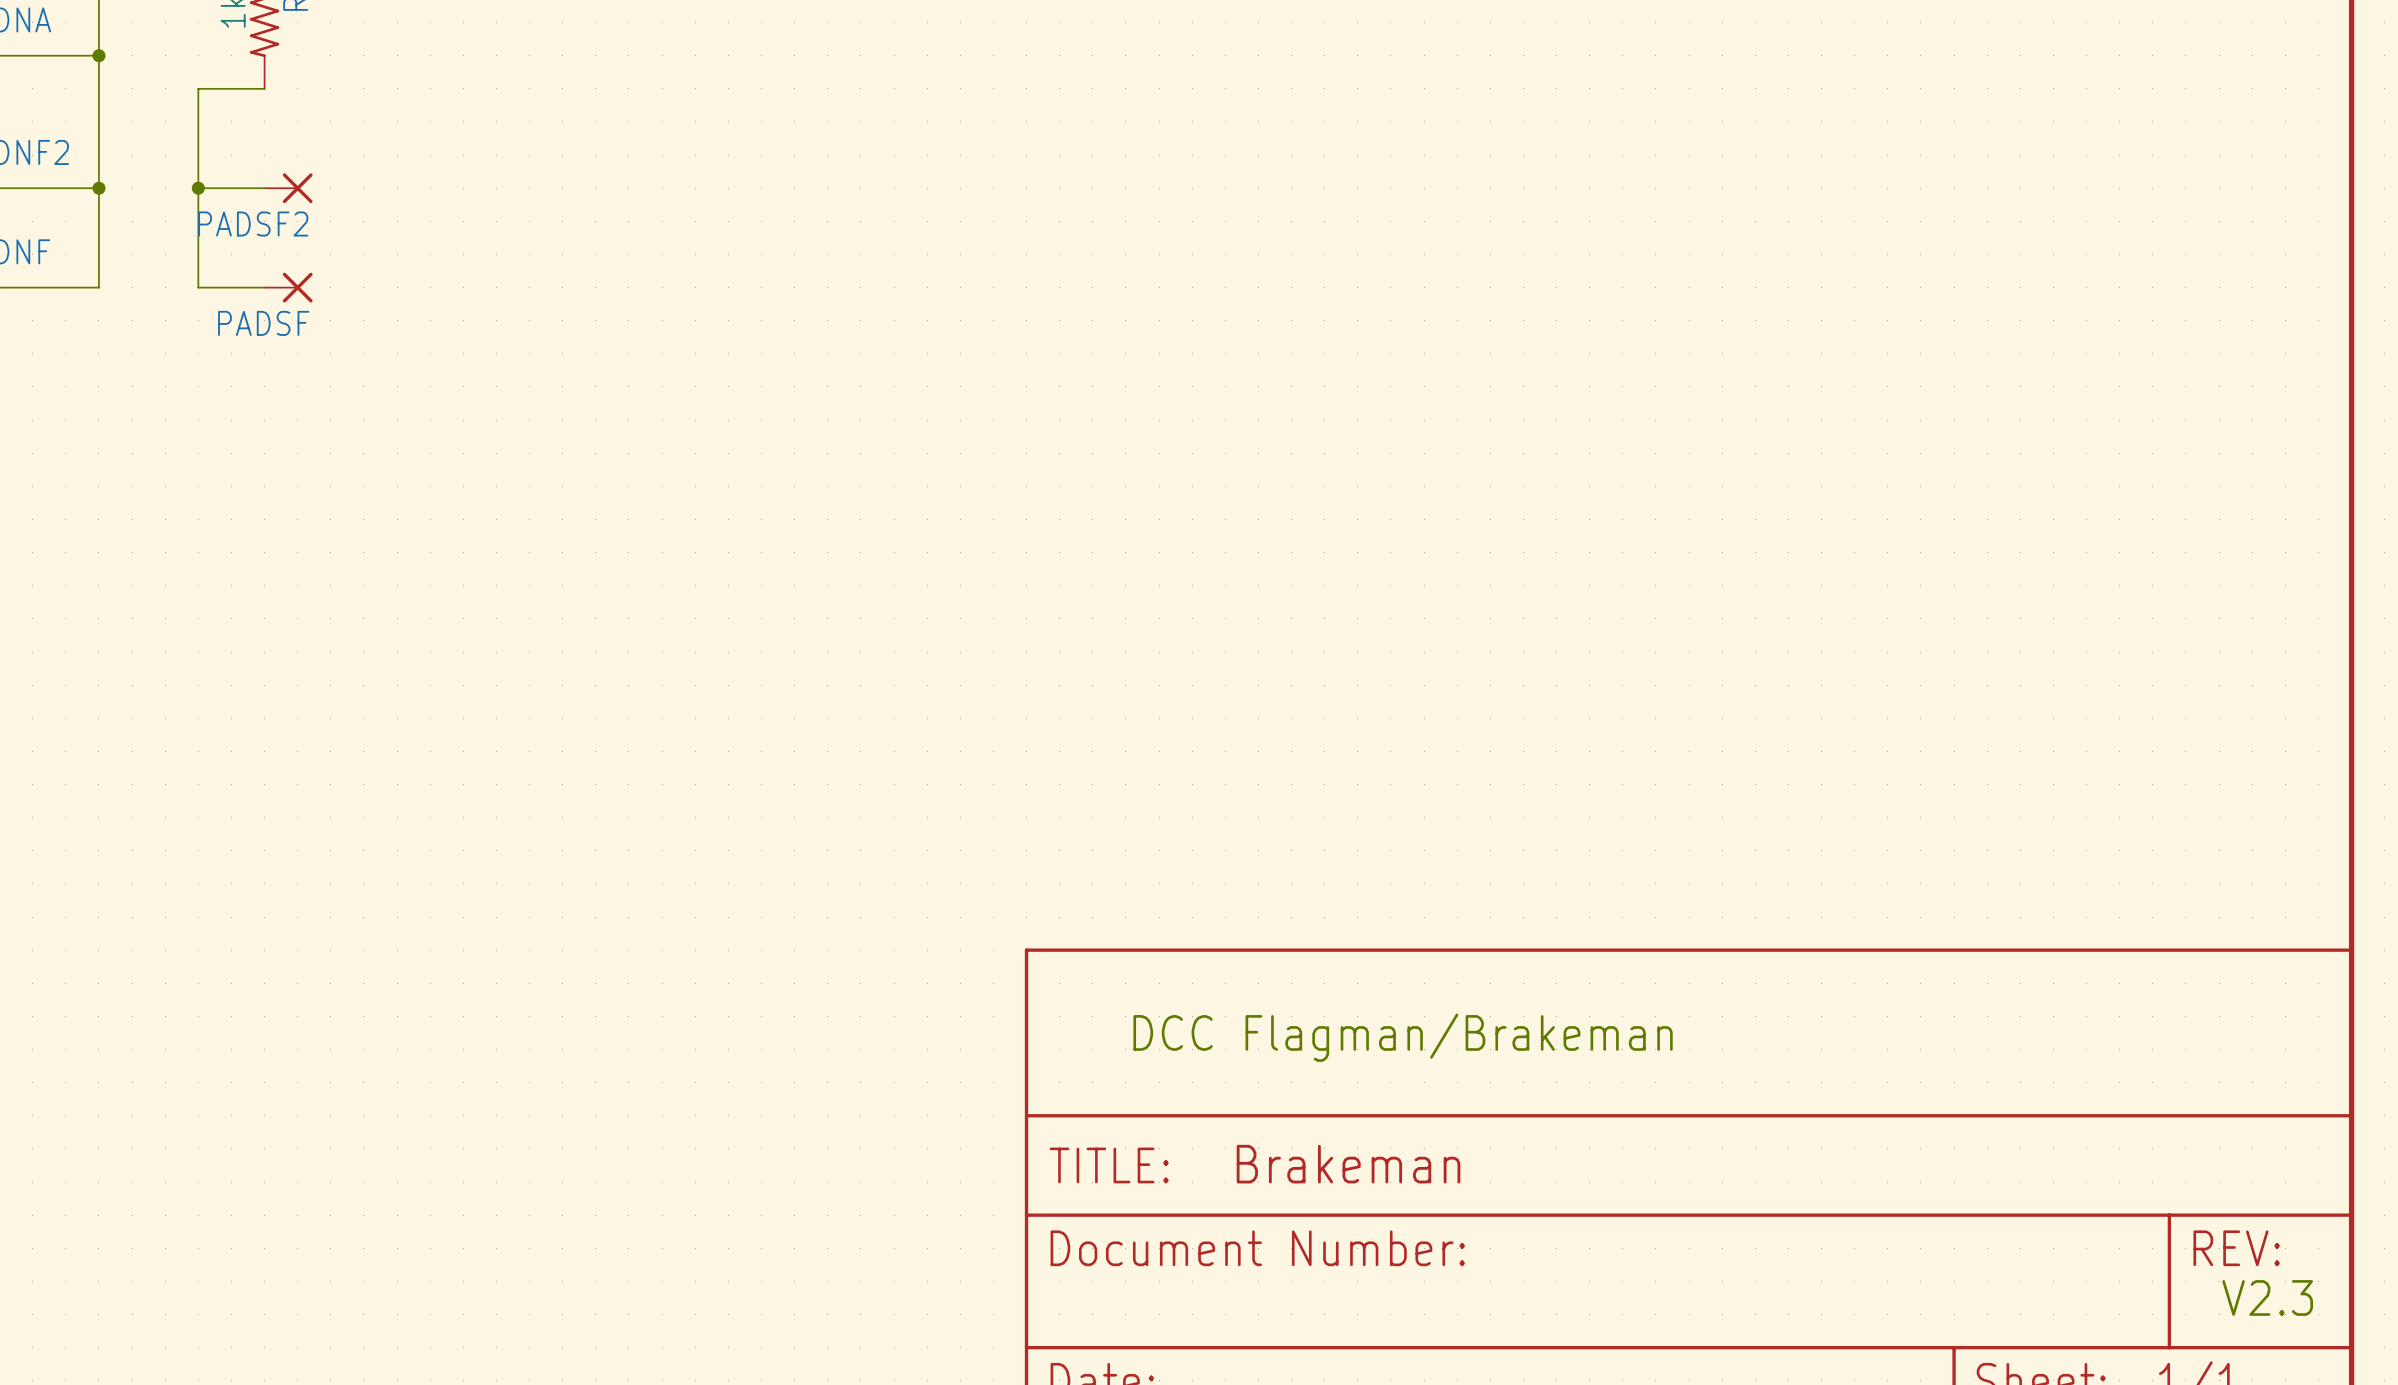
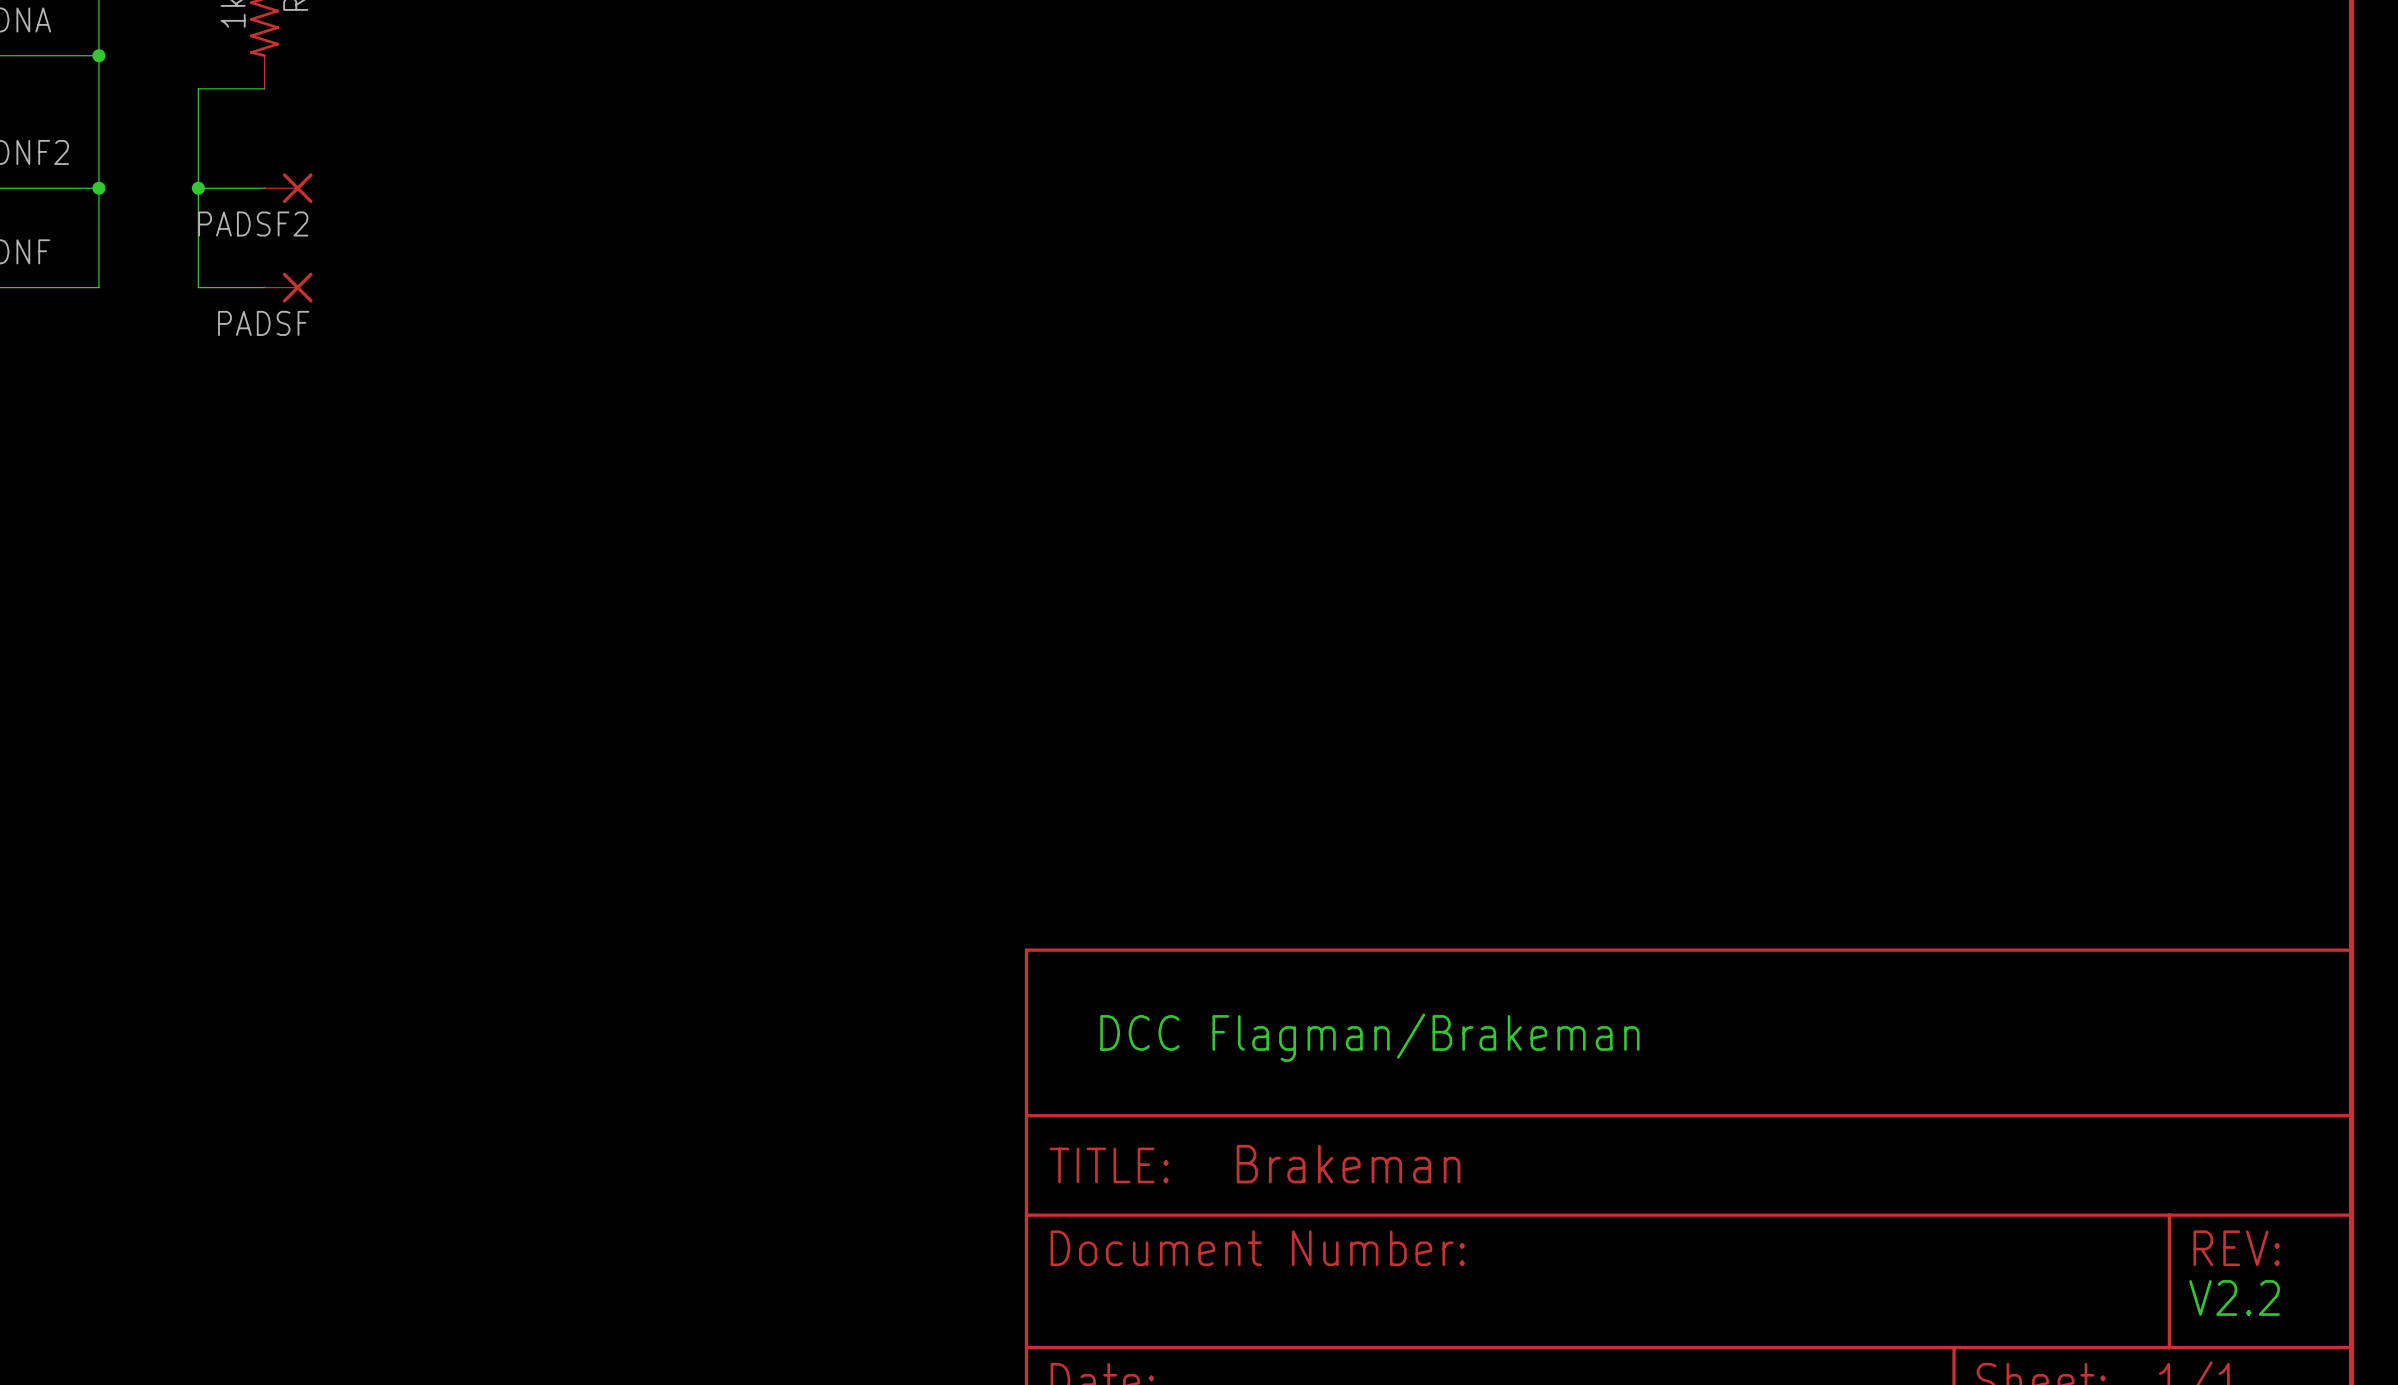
text position: DCC Flagman/Brakeman (1403, 1037) -> DCC Flagman/Brakeman (1369, 1037)
text: V2.3 (2267, 1297) -> V2.2 (2234, 1297)

